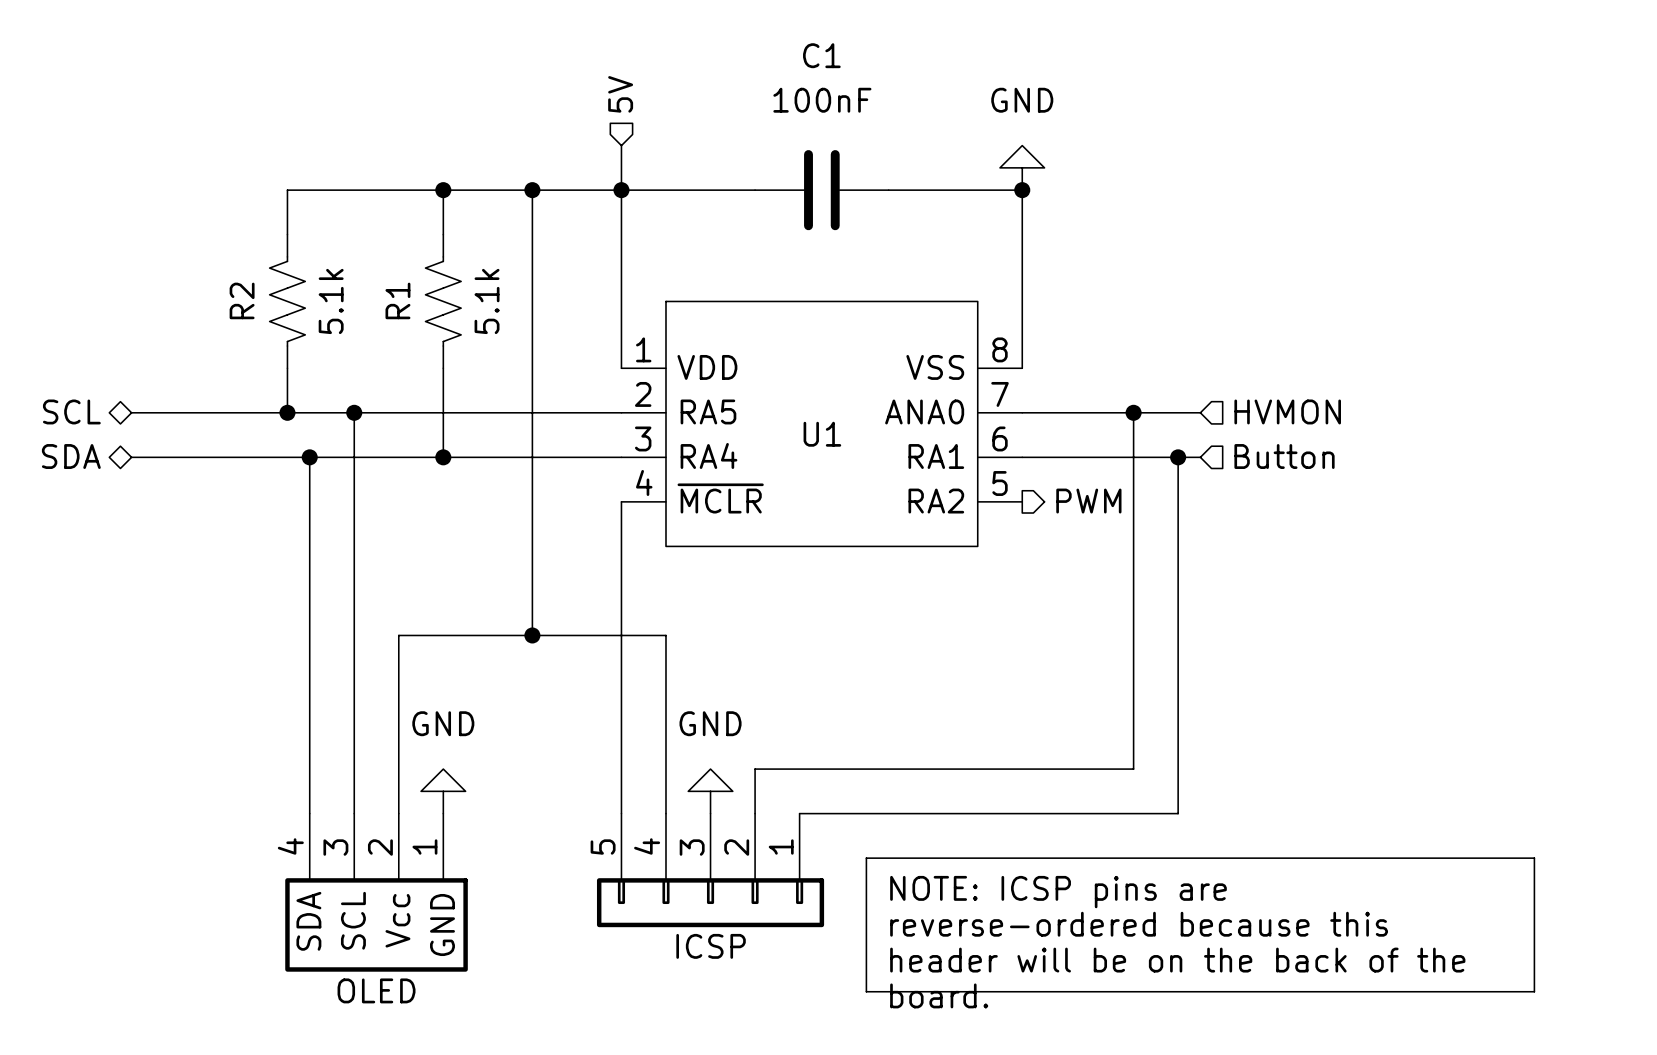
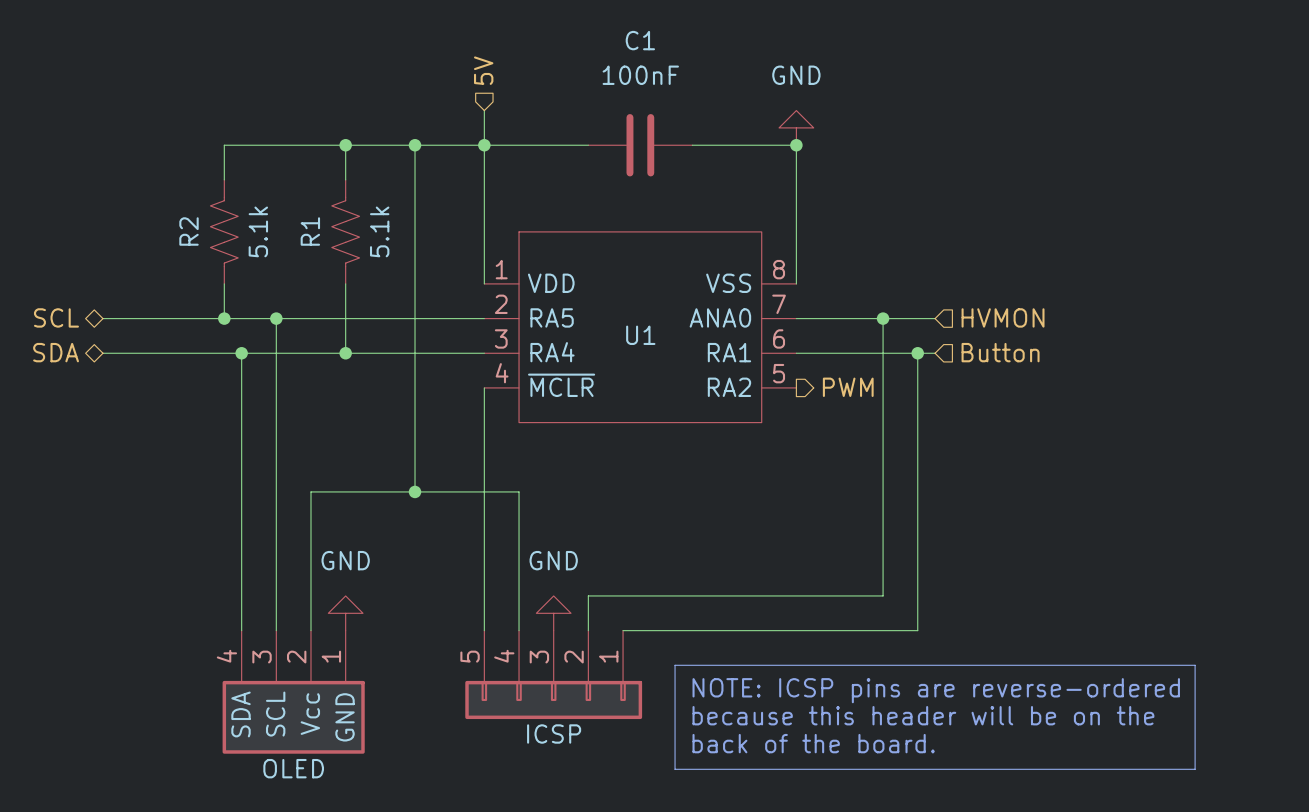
text: NOTE: ICSP pins are (1058, 892) -> NOTE: ICSP pins are reverse-ordered (936, 690)
text: reverse-ordered because this (1139, 924) -> because this header will be on the (923, 715)
text: header will be on the back of the (1177, 960) -> back of the board. (813, 743)
text: board. (939, 995) -> none

